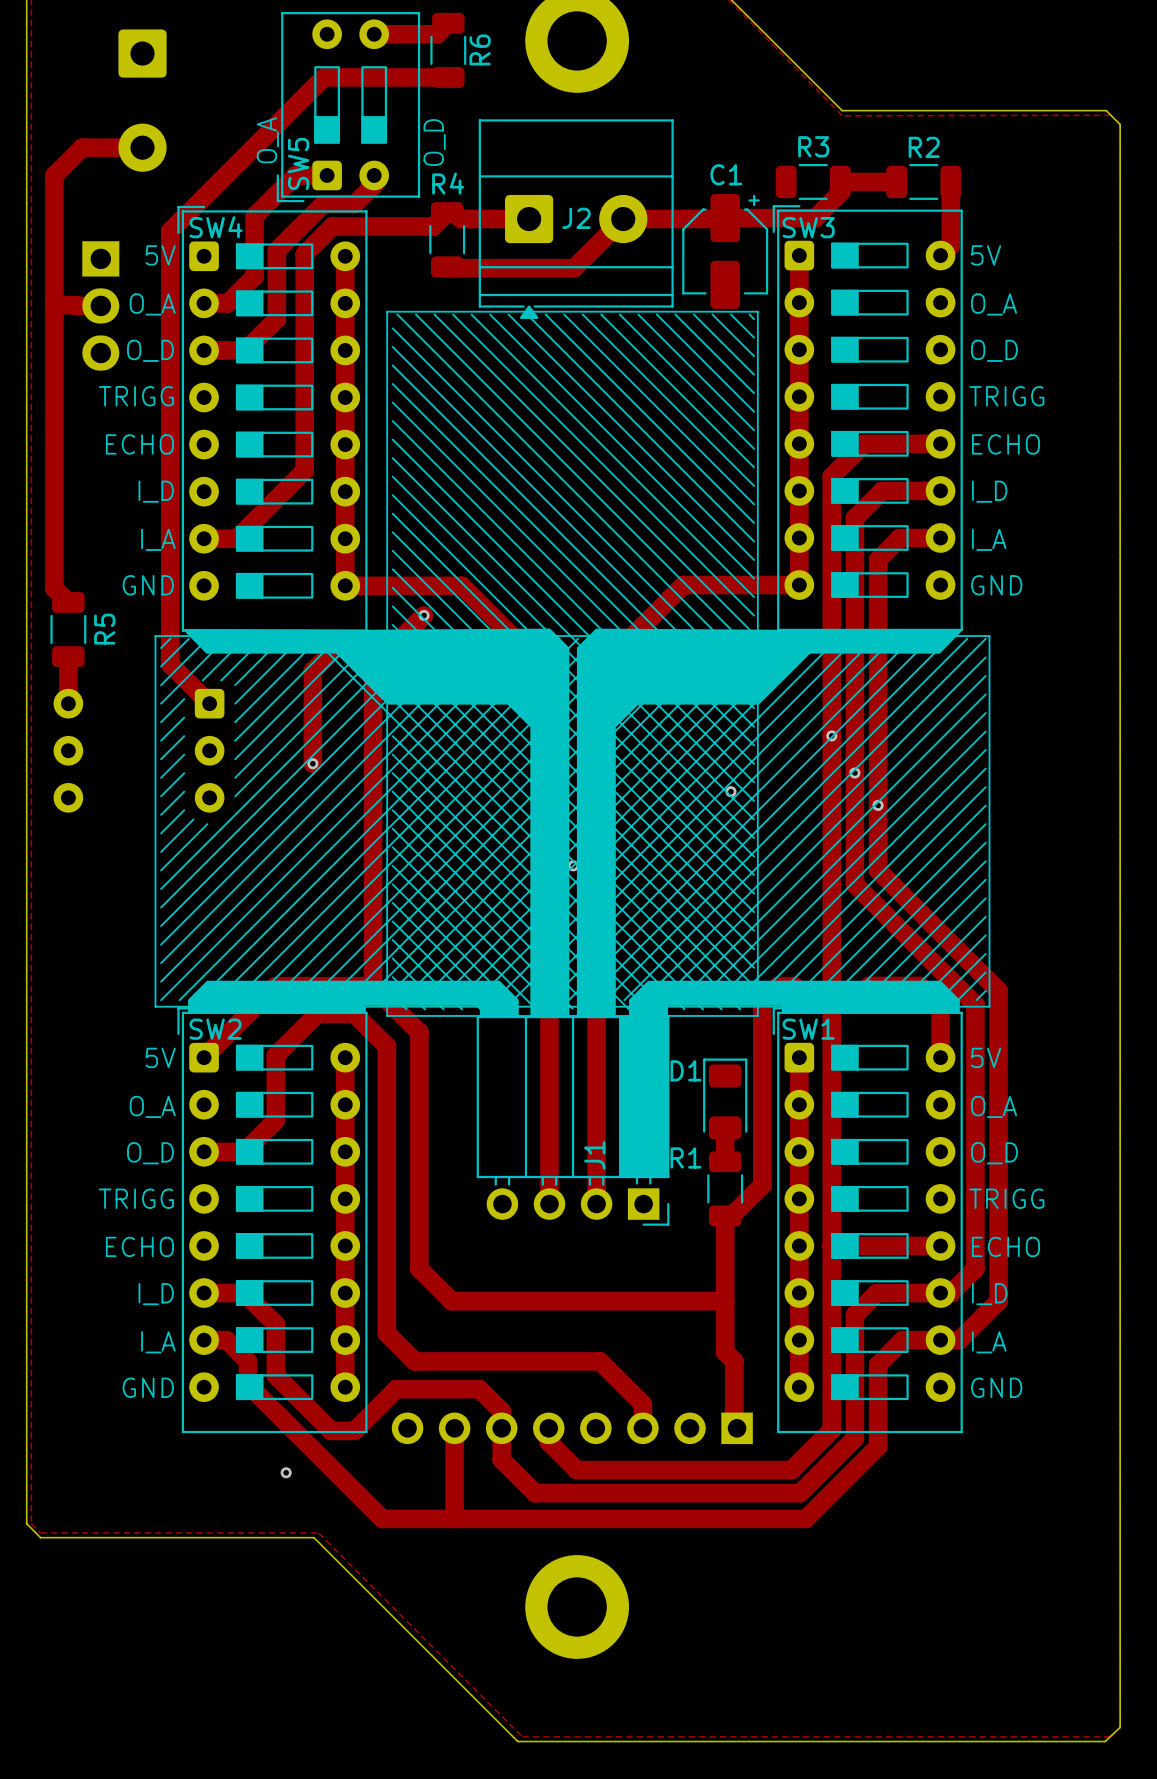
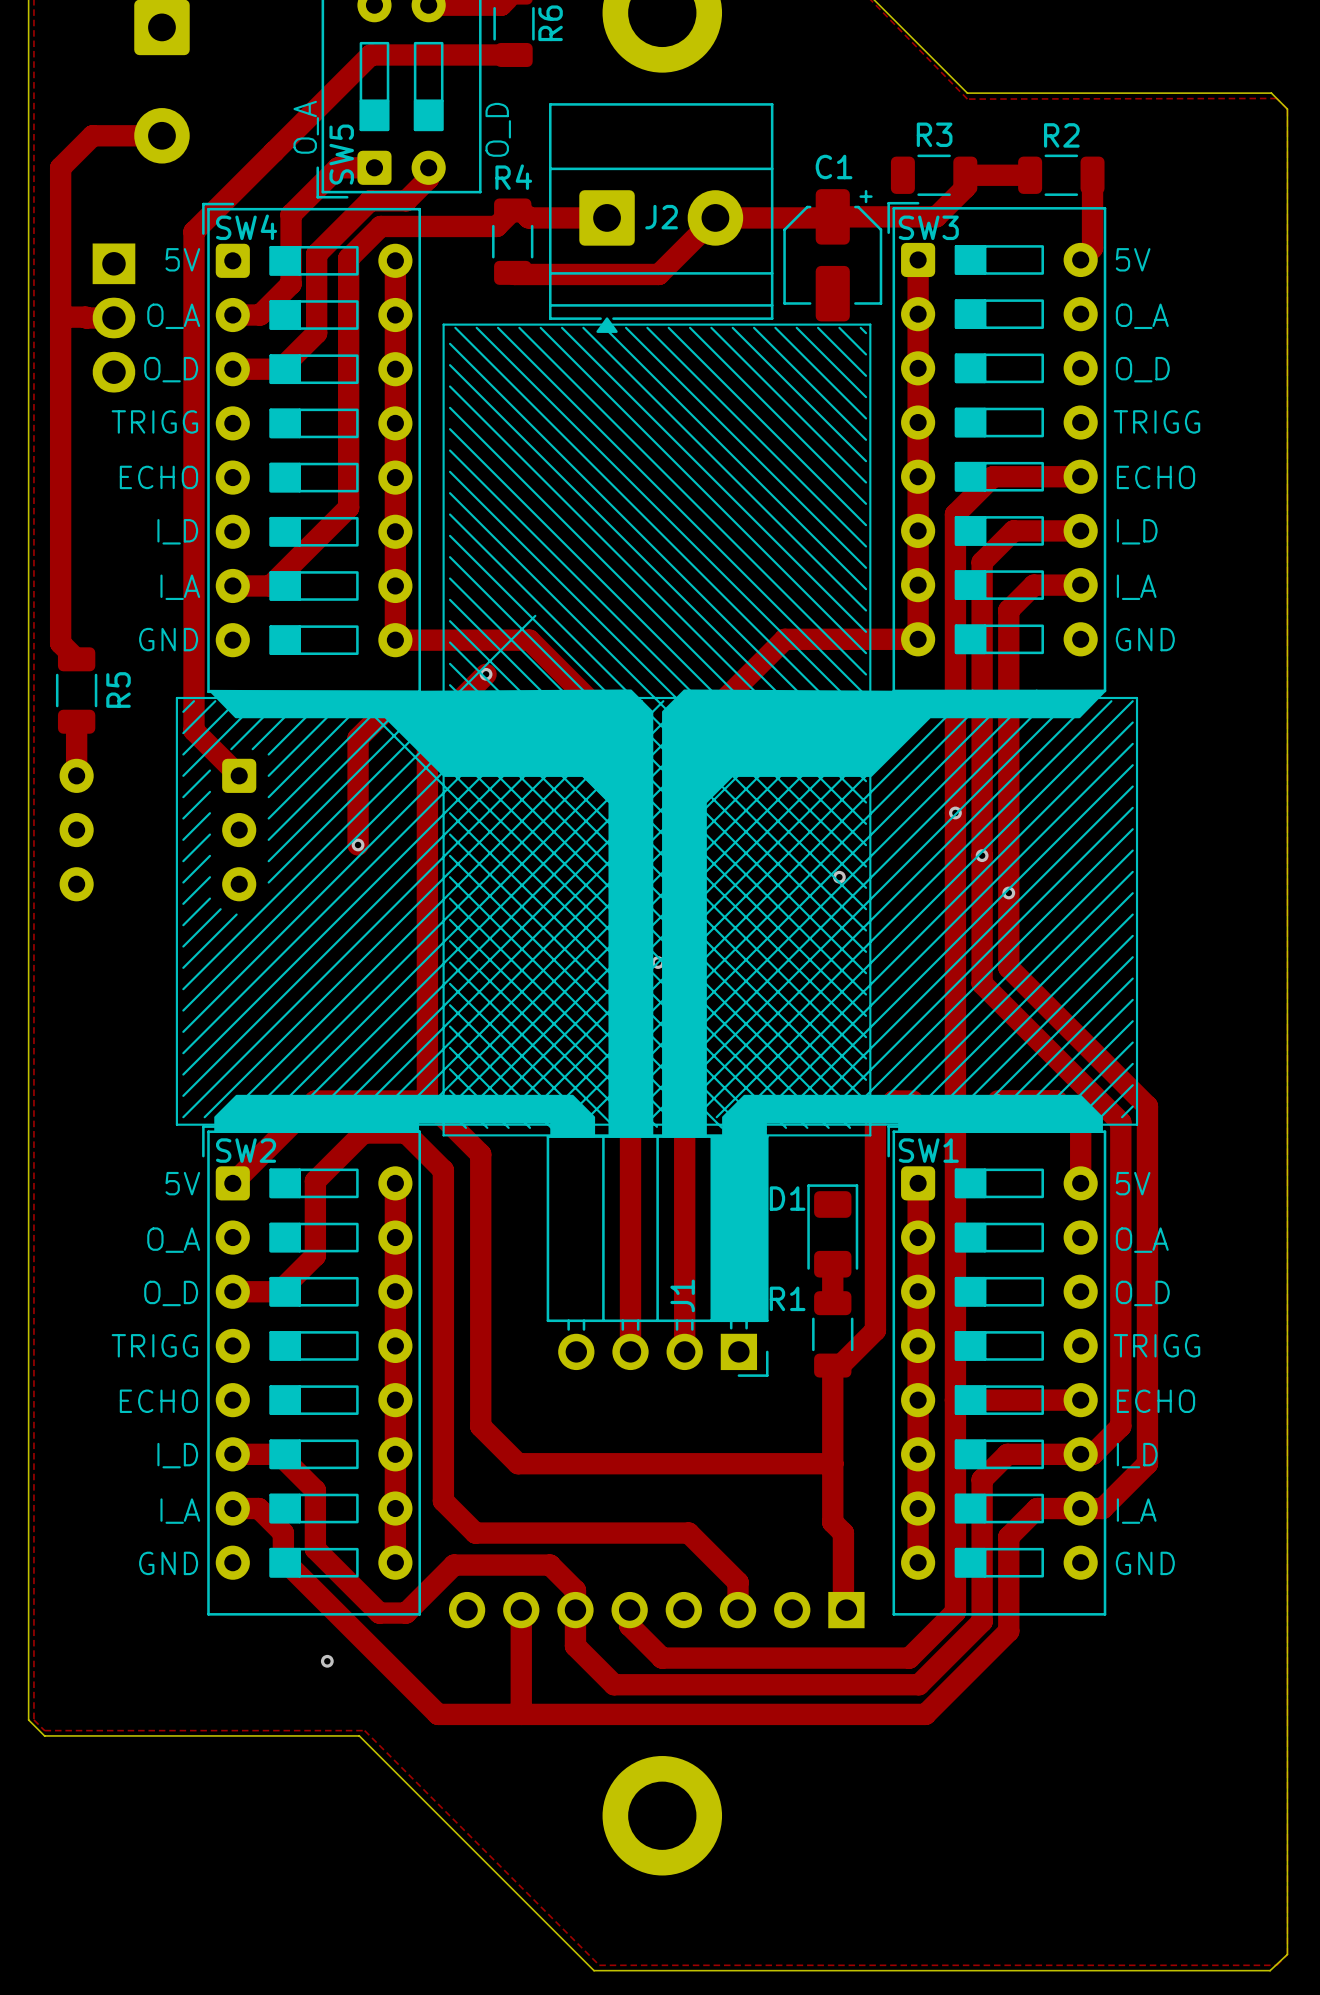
line: none -> (535, 615) (434, 717)

